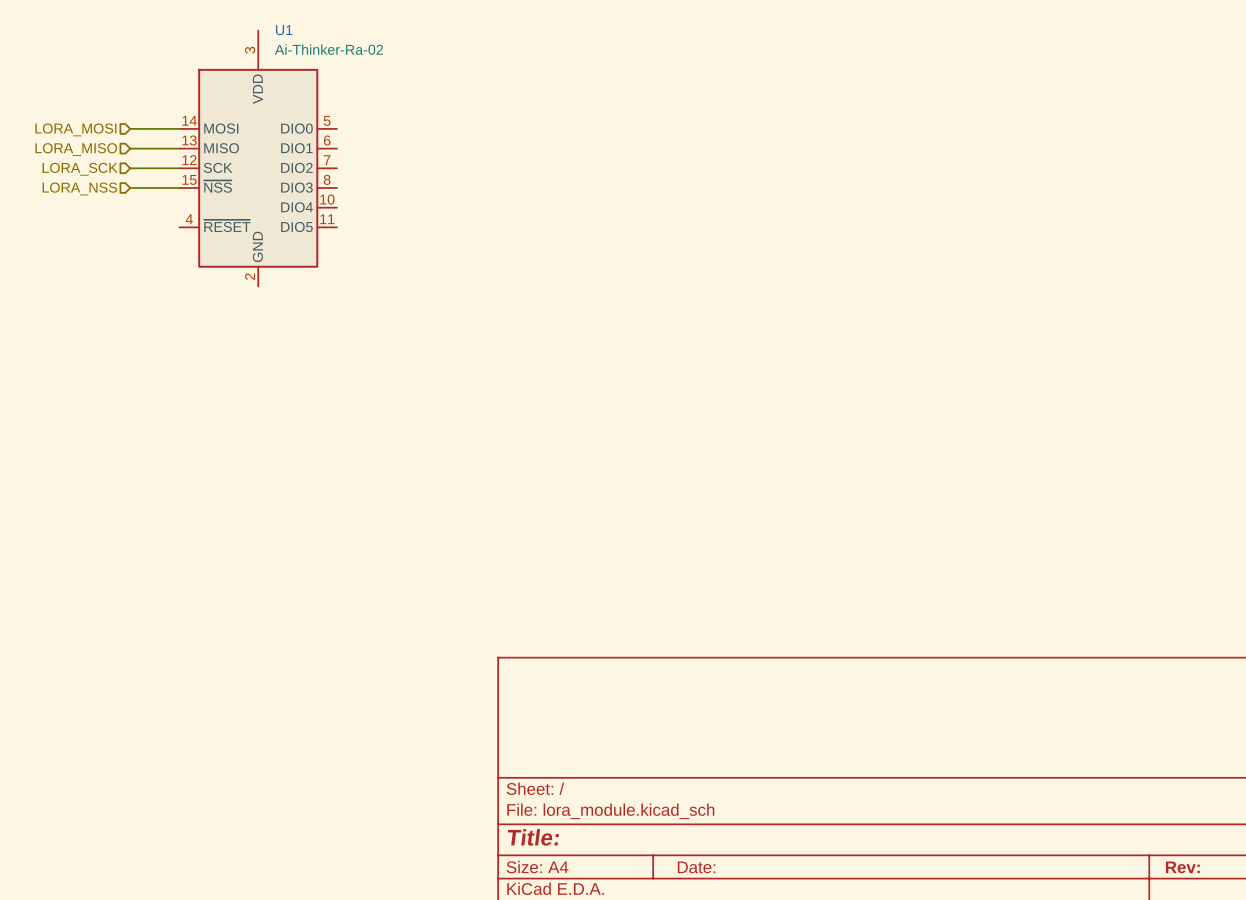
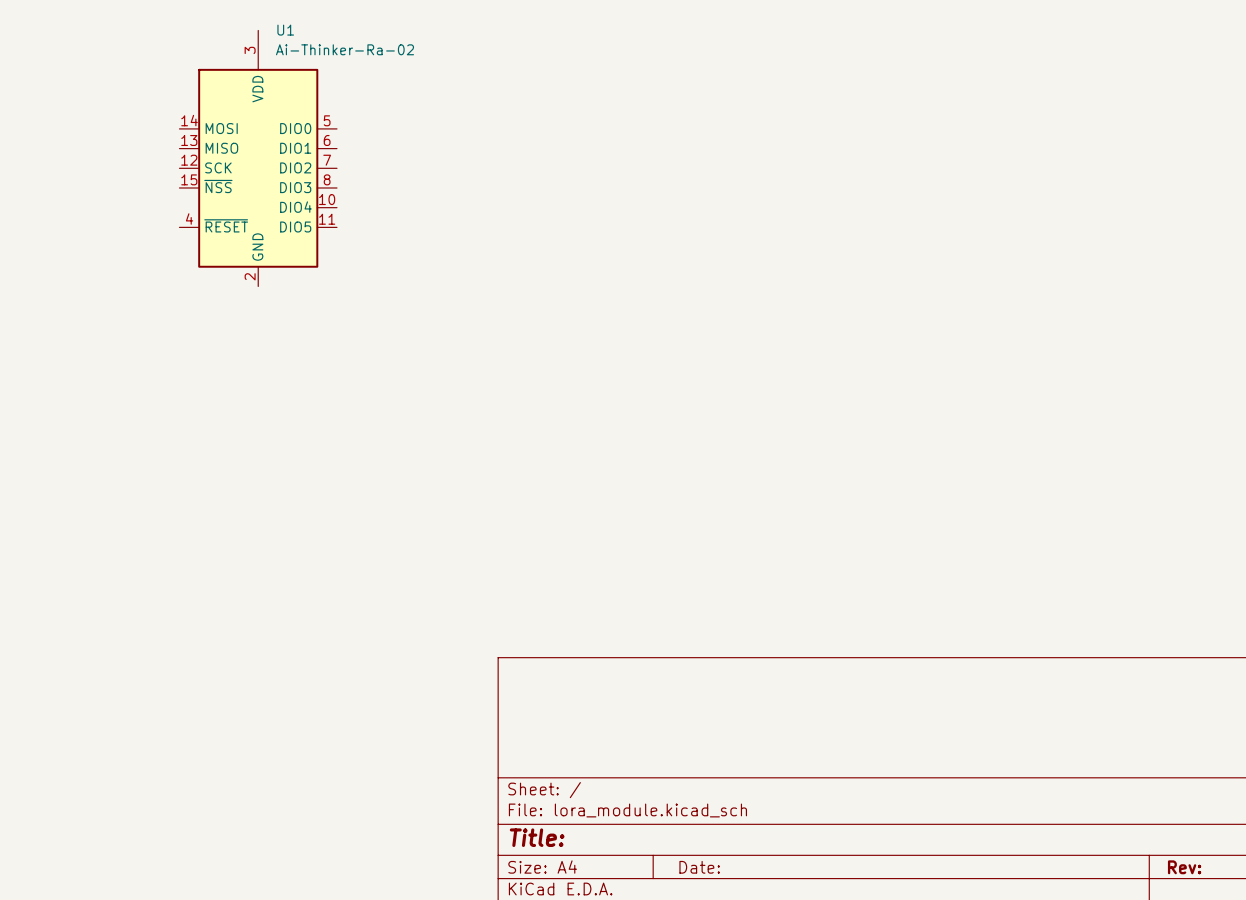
wire: (130, 128) (179, 128) -> none
hierarchical label: LORA_MOSI (75, 129) -> none
wire: (130, 148) (179, 148) -> none
hierarchical label: LORA_MISO (76, 149) -> none
wire: (130, 168) (179, 168) -> none
hierarchical label: LORA_SCK (80, 169) -> none
wire: (130, 187) (179, 187) -> none
hierarchical label: LORA_NSS (79, 188) -> none

